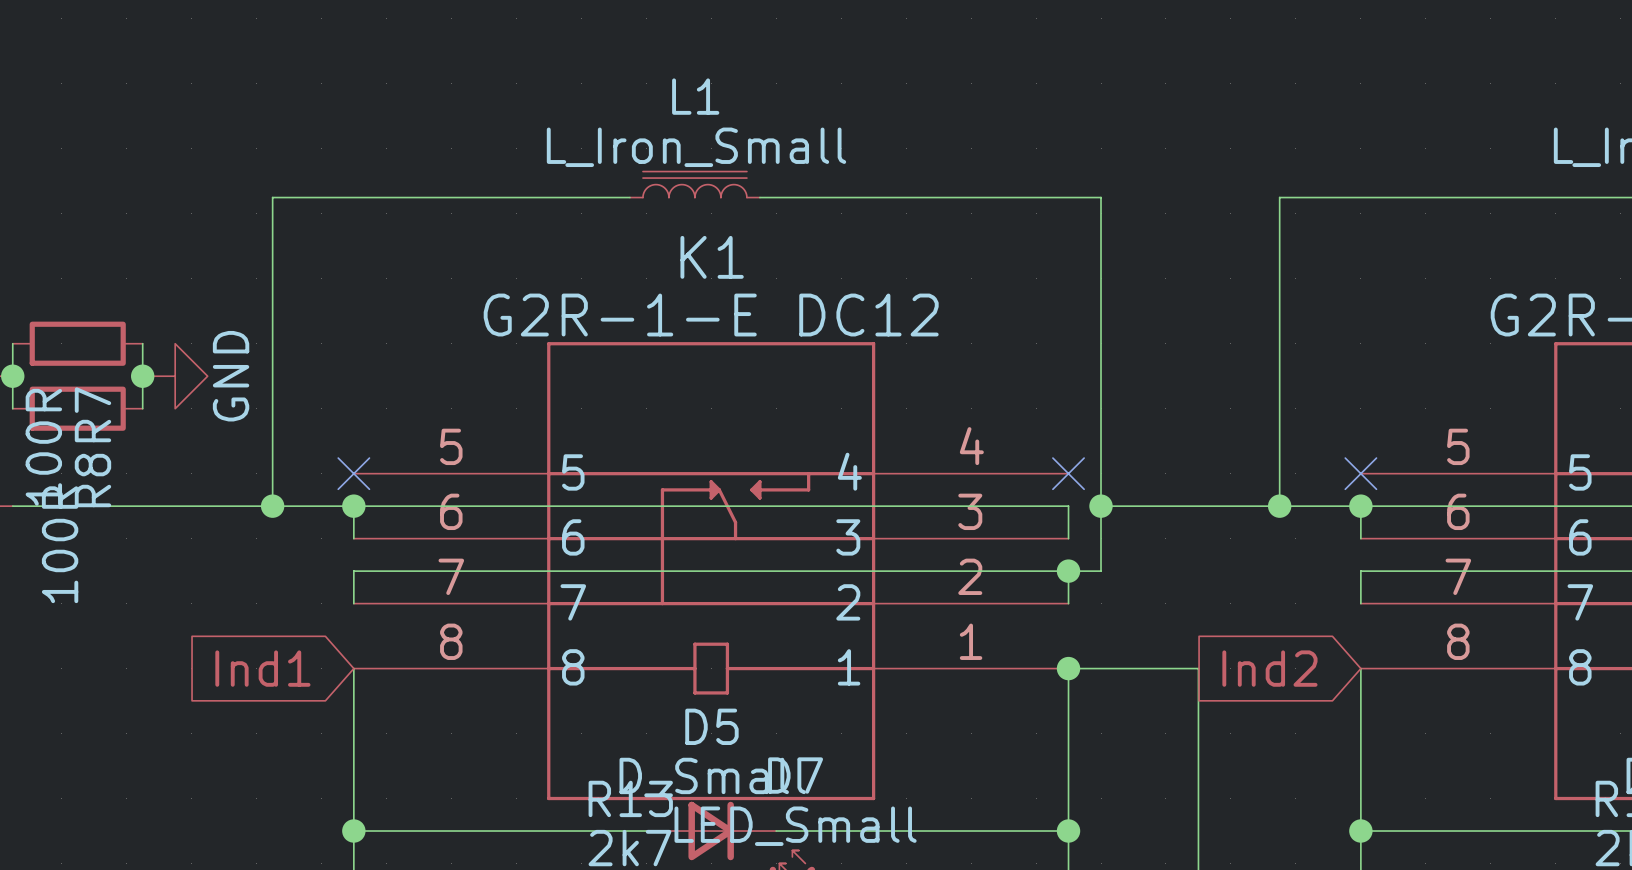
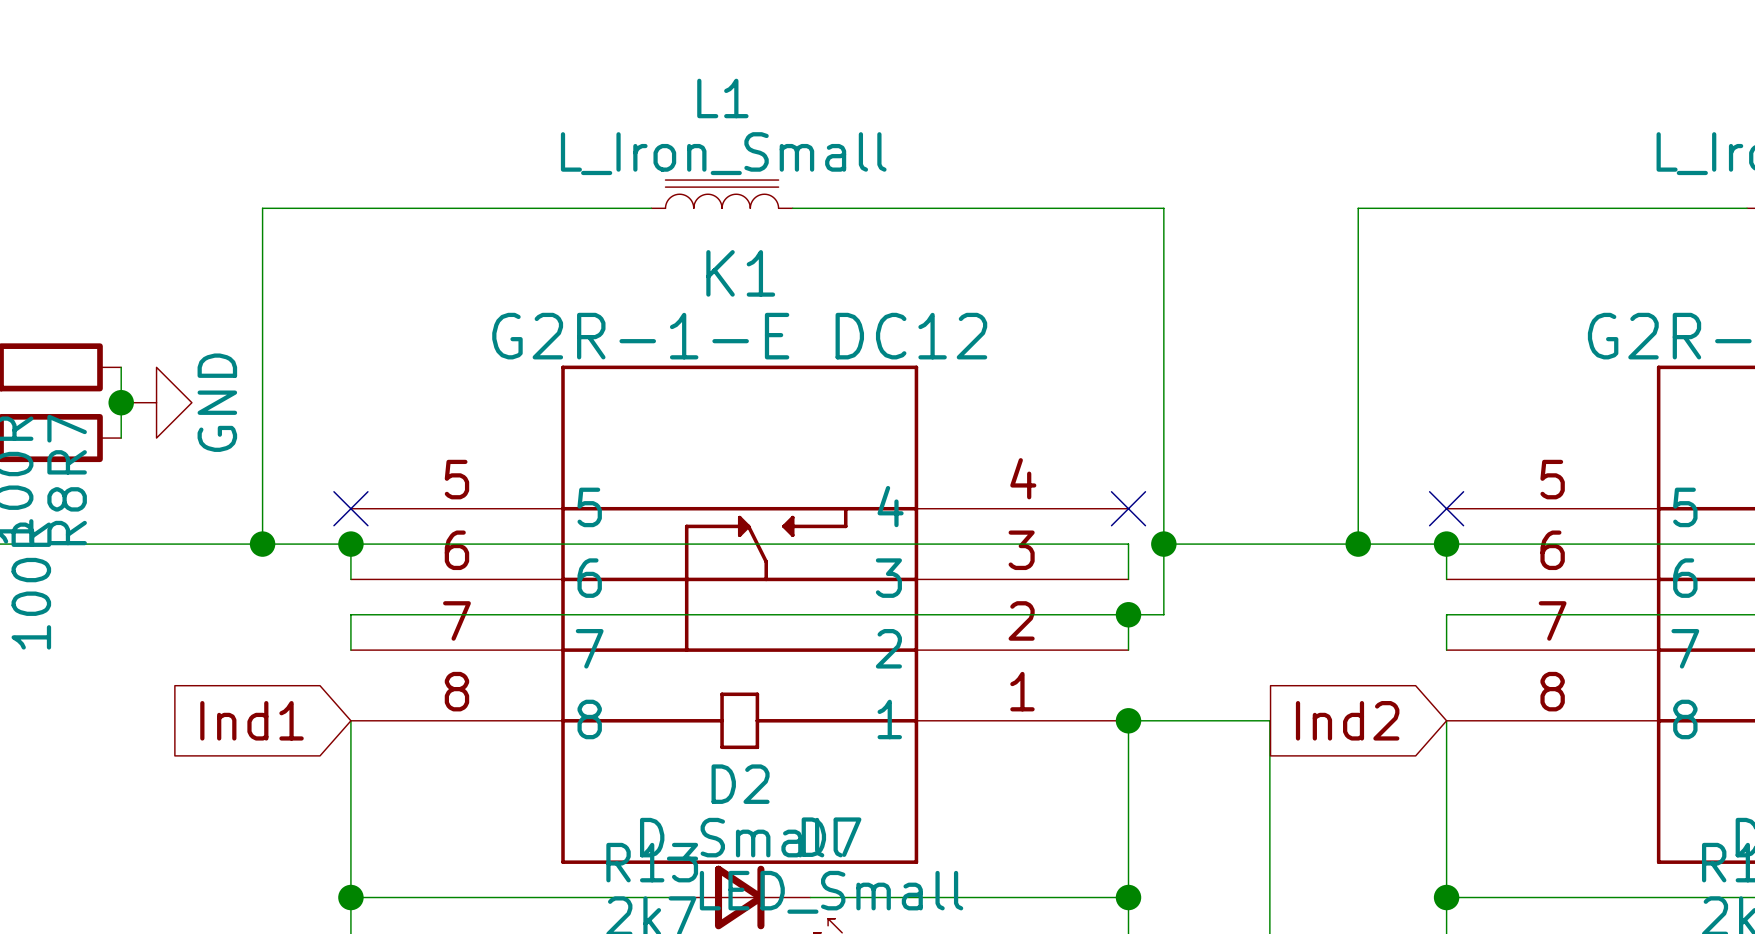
D5 name: D5 (711, 726) -> D2 (740, 784)

